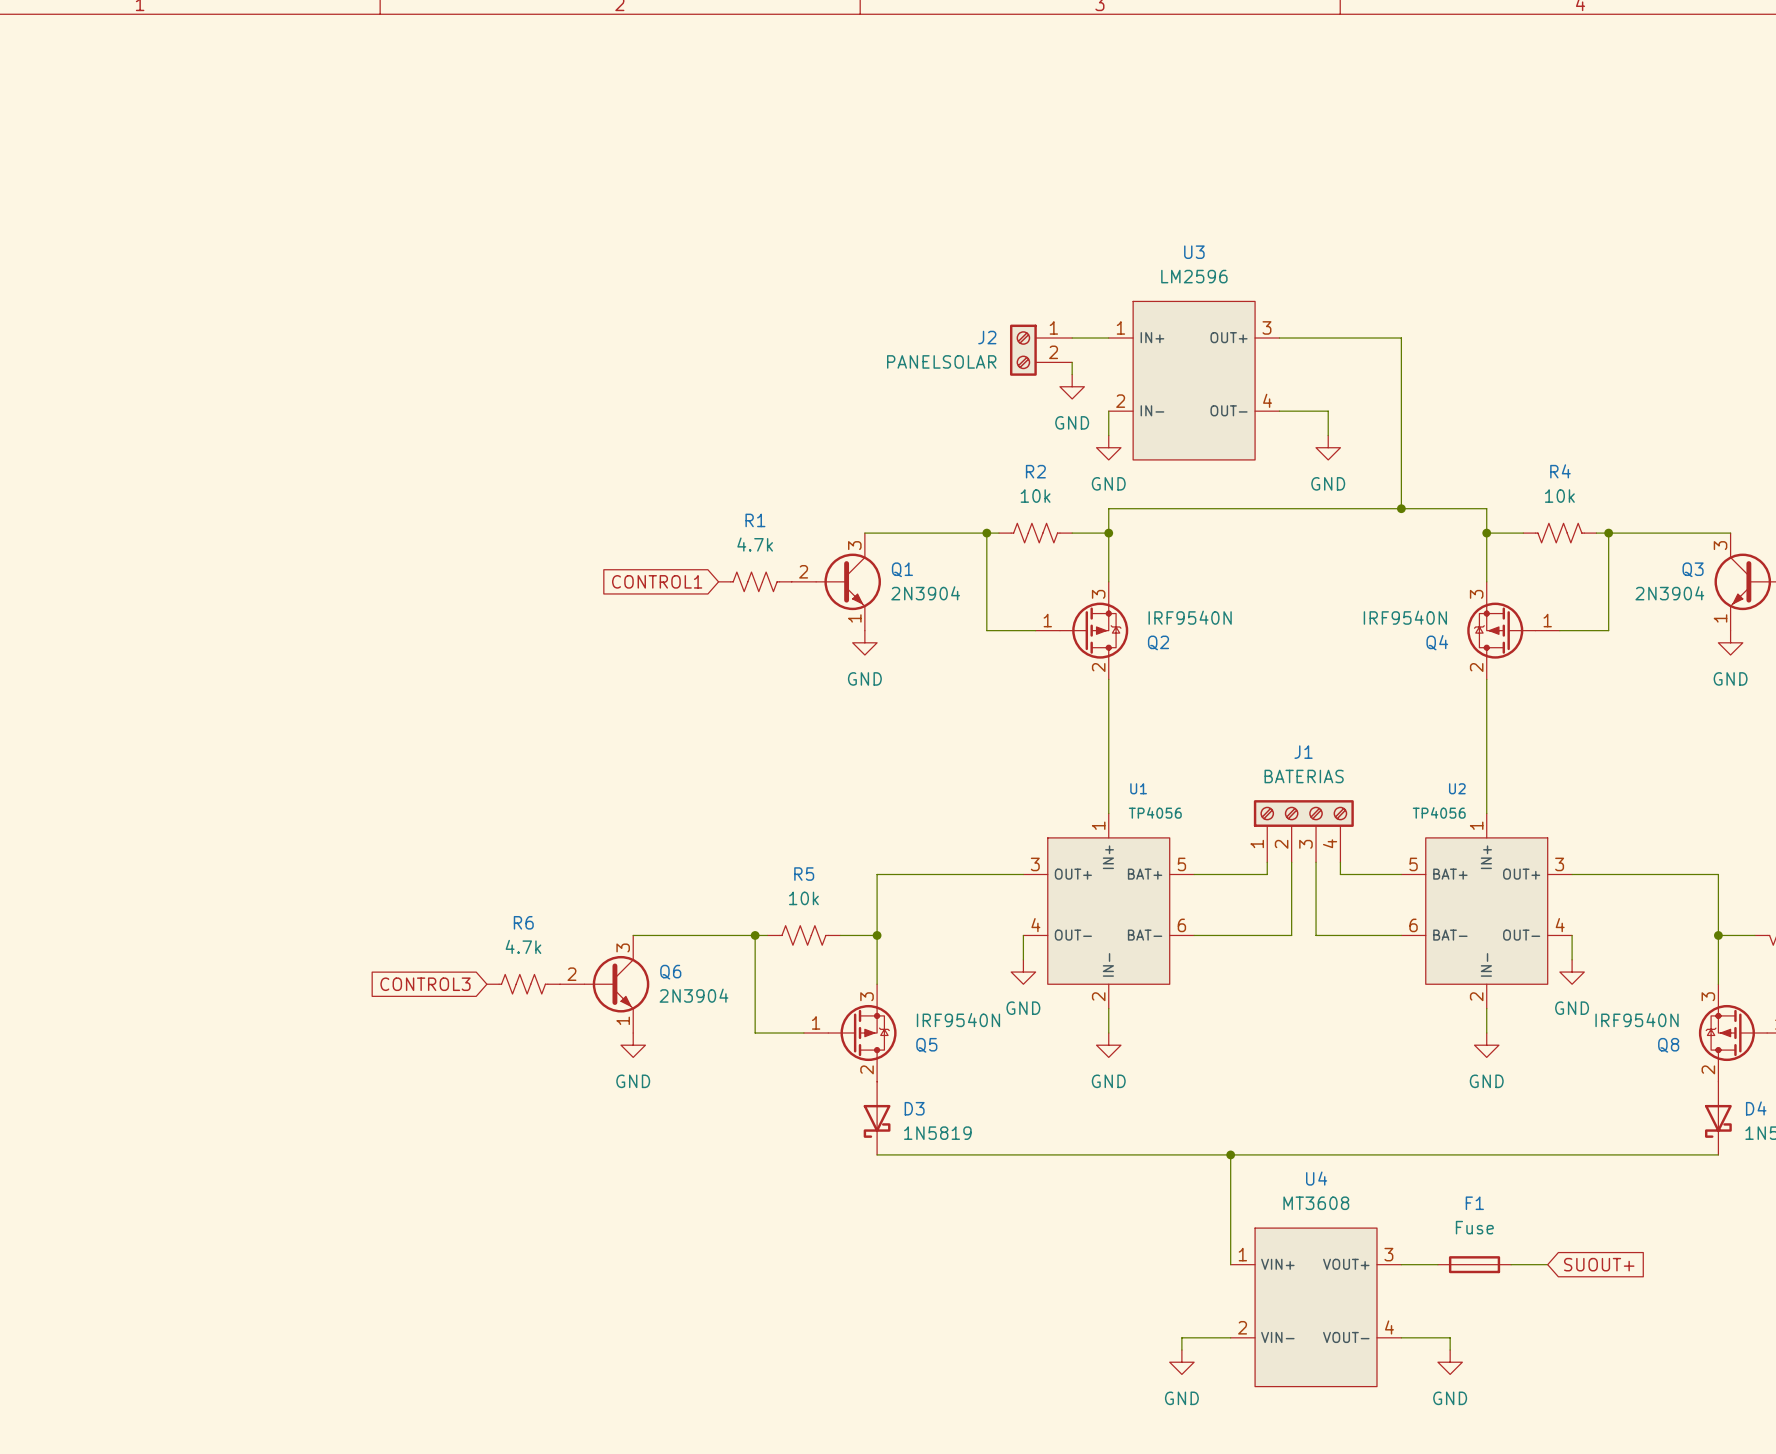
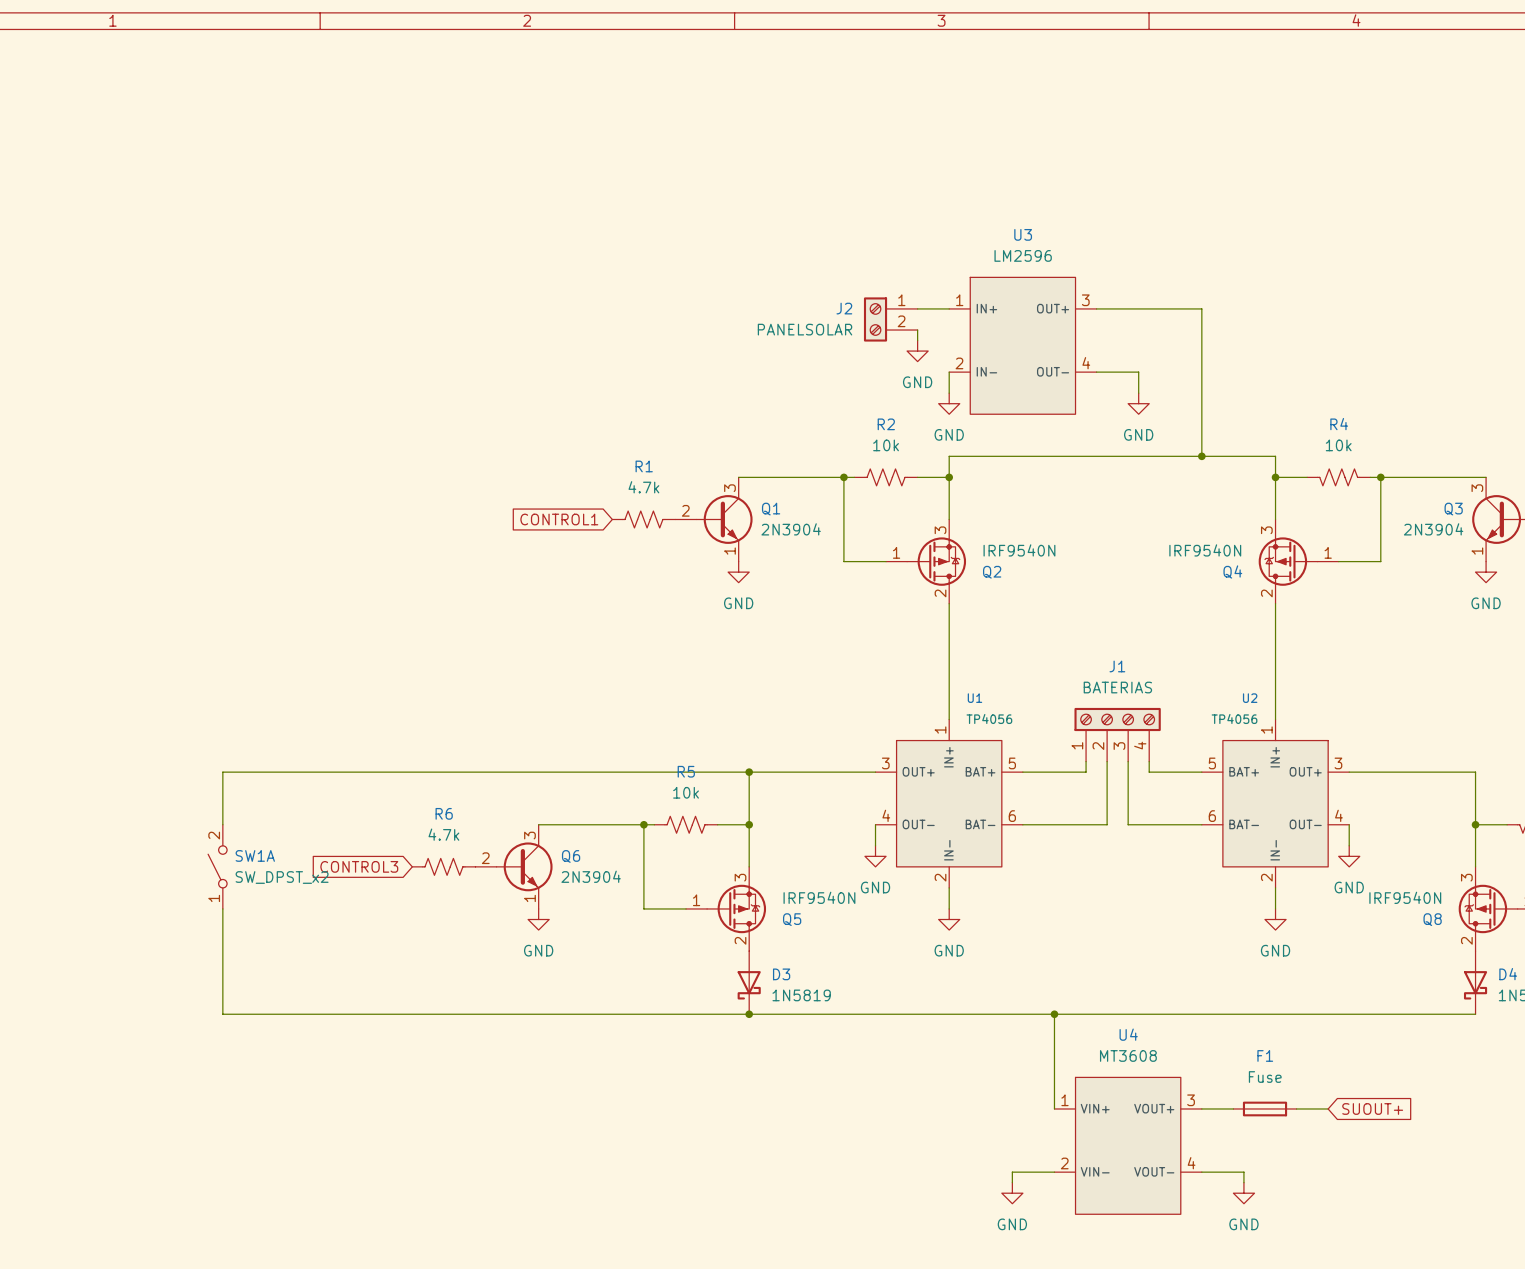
wire: none -> (749, 772) (222, 772) (222, 824)
junction: none -> (749, 772)
SW1A: none -> SW_DPST_x2 (217, 866)
wire: none -> (222, 908) (222, 1014) (749, 1014)
junction: none -> (749, 1014)

